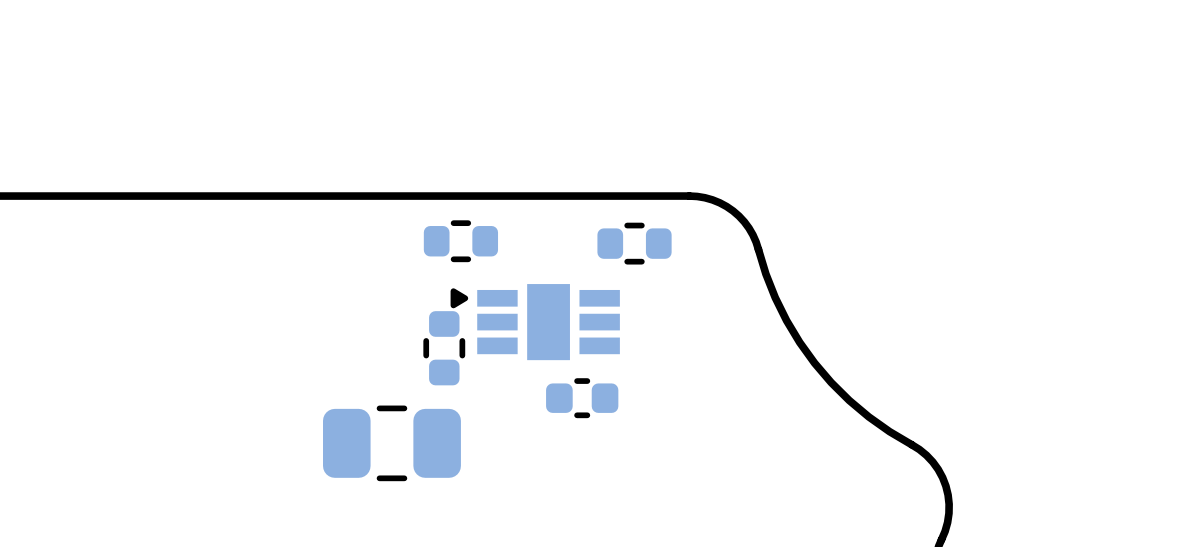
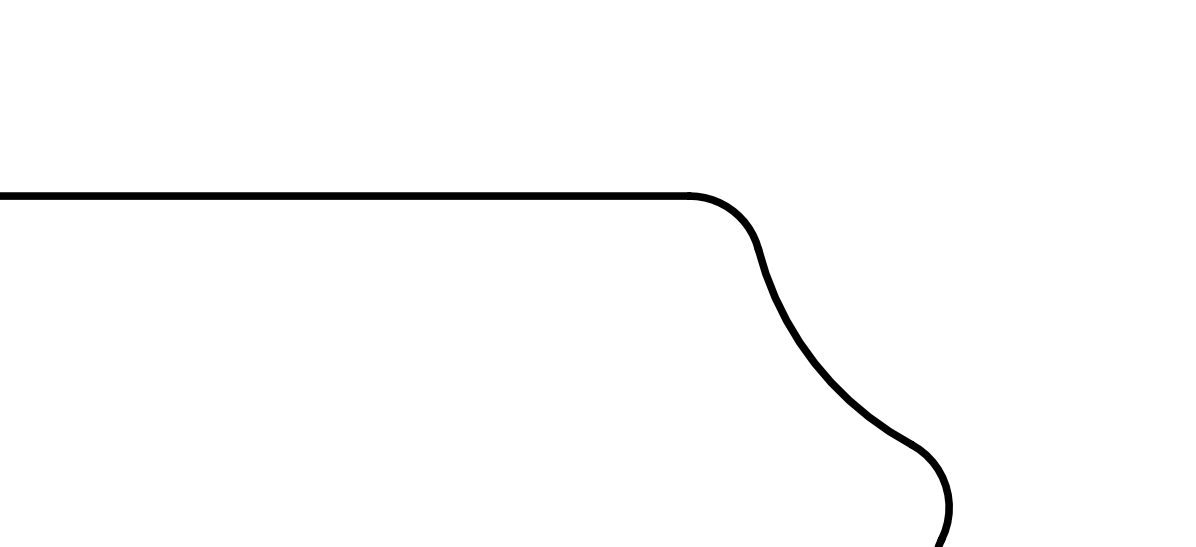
part: (460, 241) -> none
part: (634, 243) -> none
part: (535, 322) -> none
part: (444, 348) -> none
part: (582, 398) -> none
part: (391, 443) -> none

